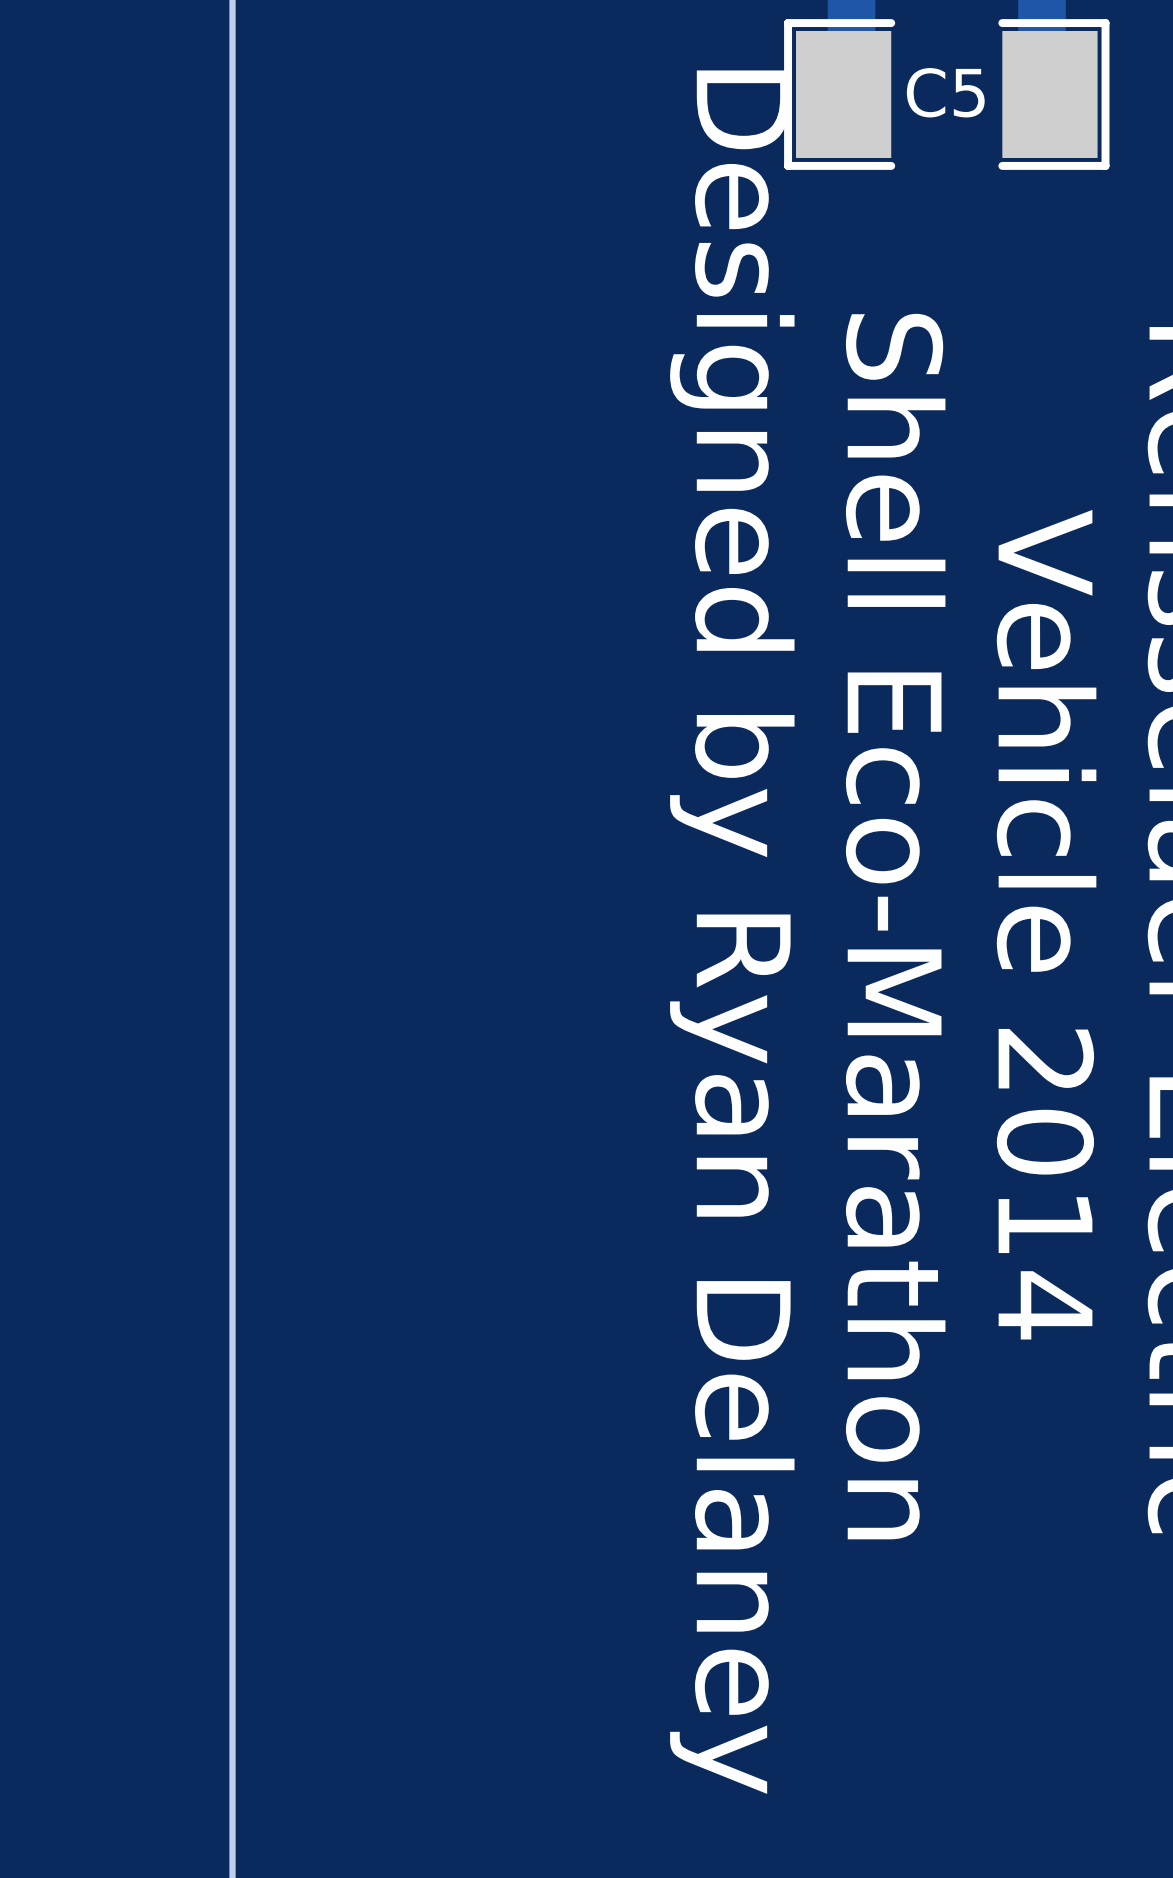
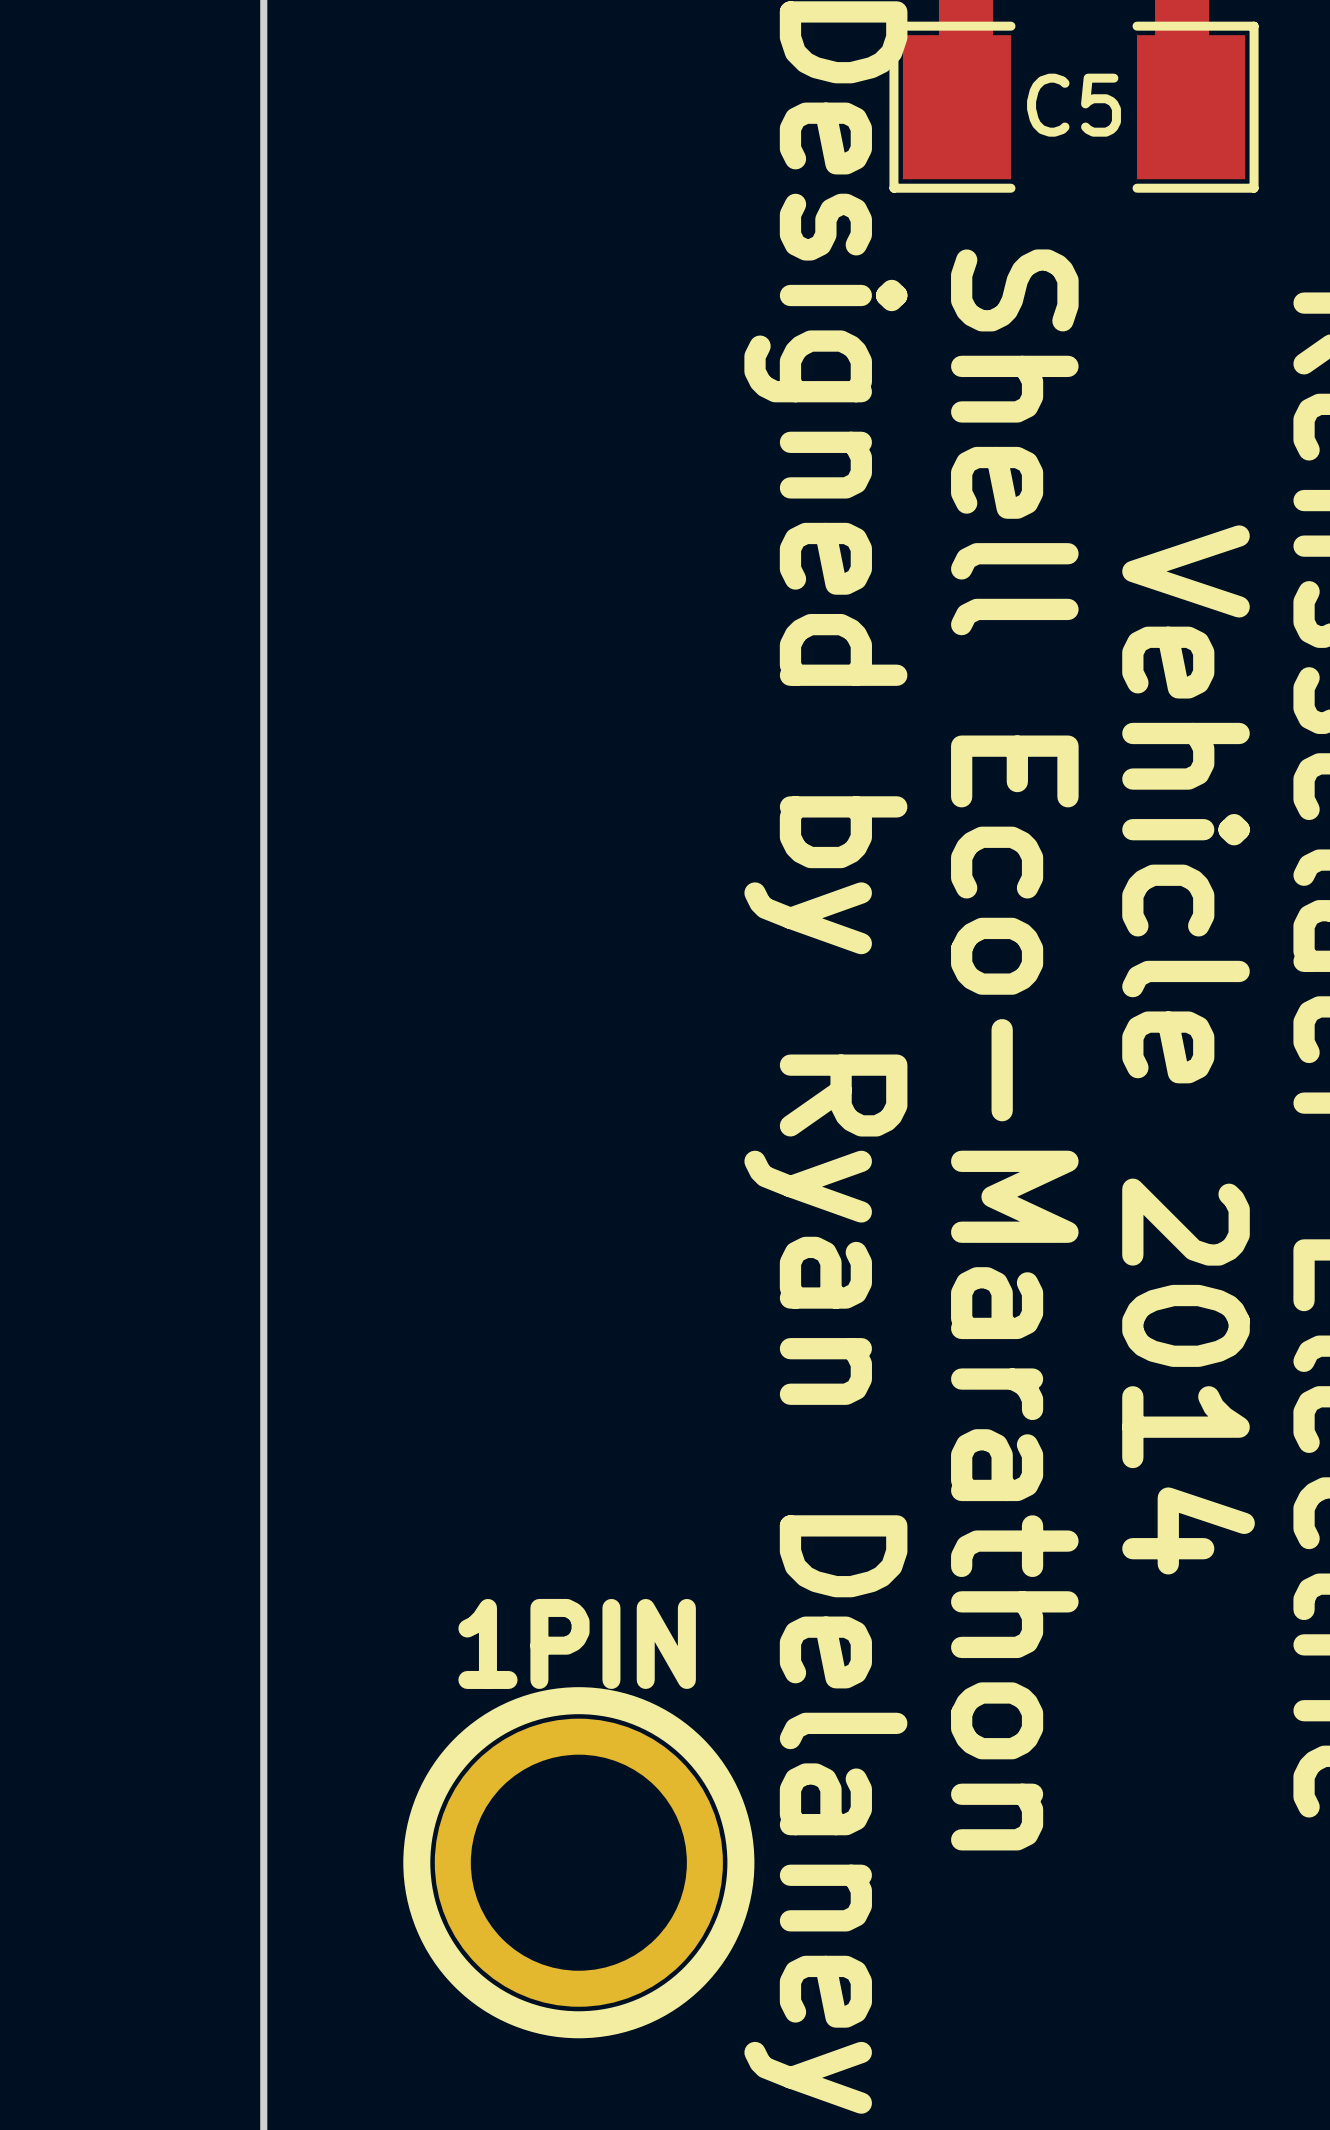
1PIN: none -> (578, 1862)

